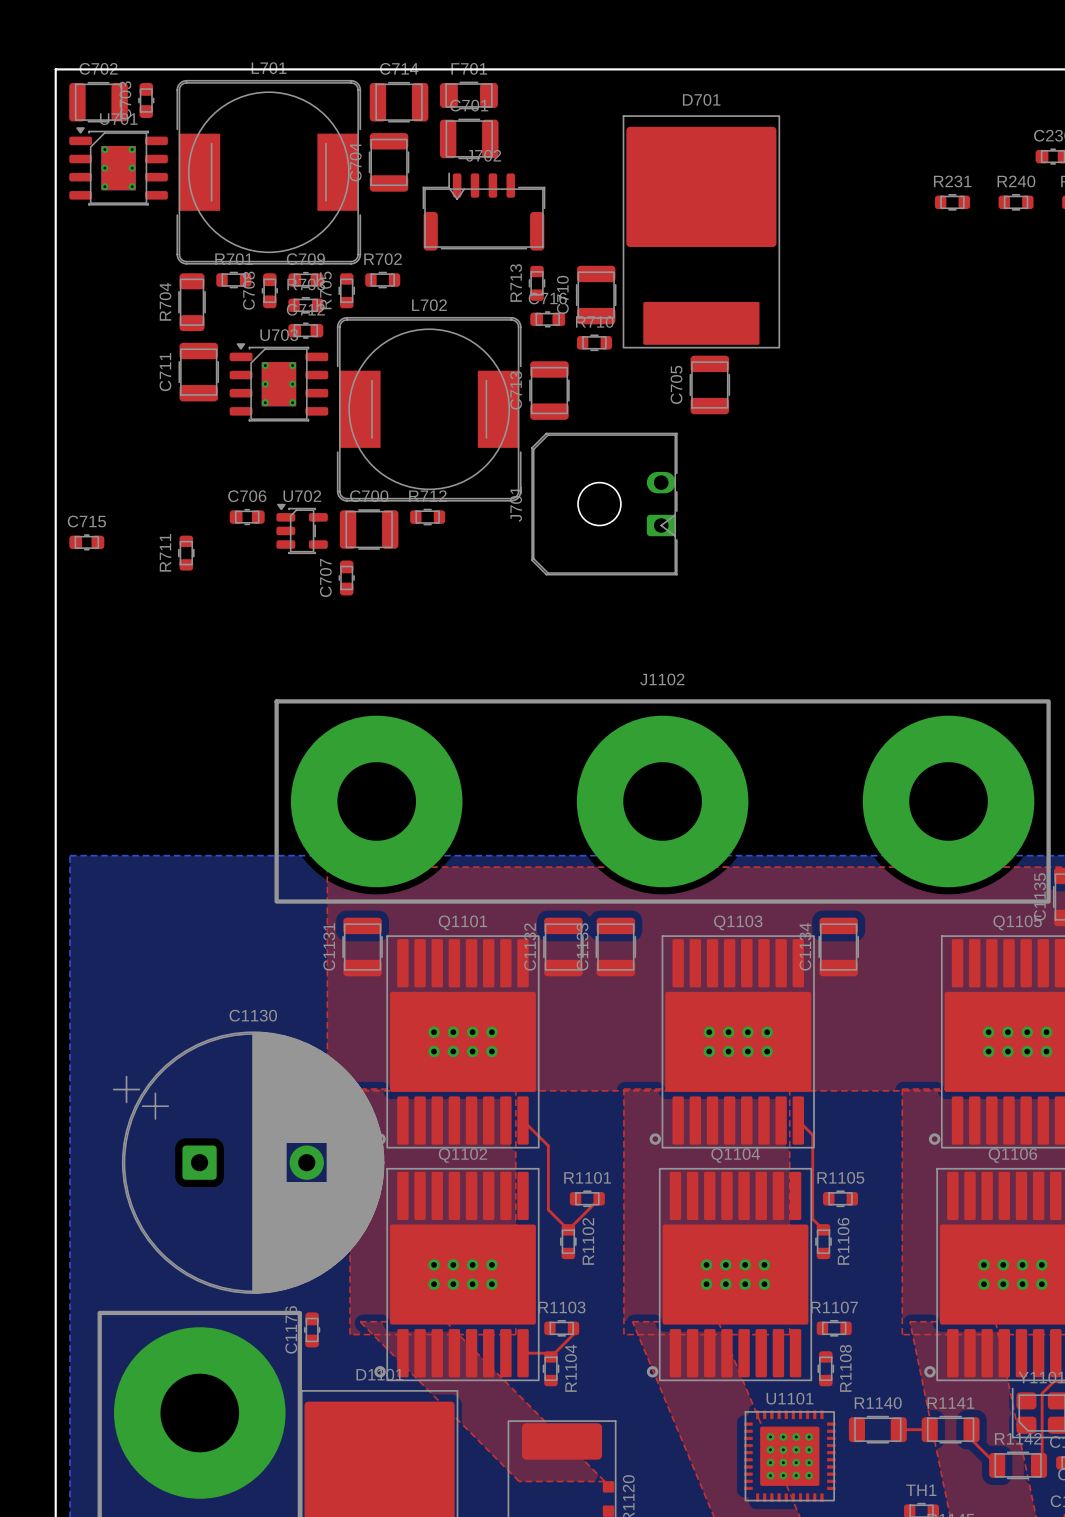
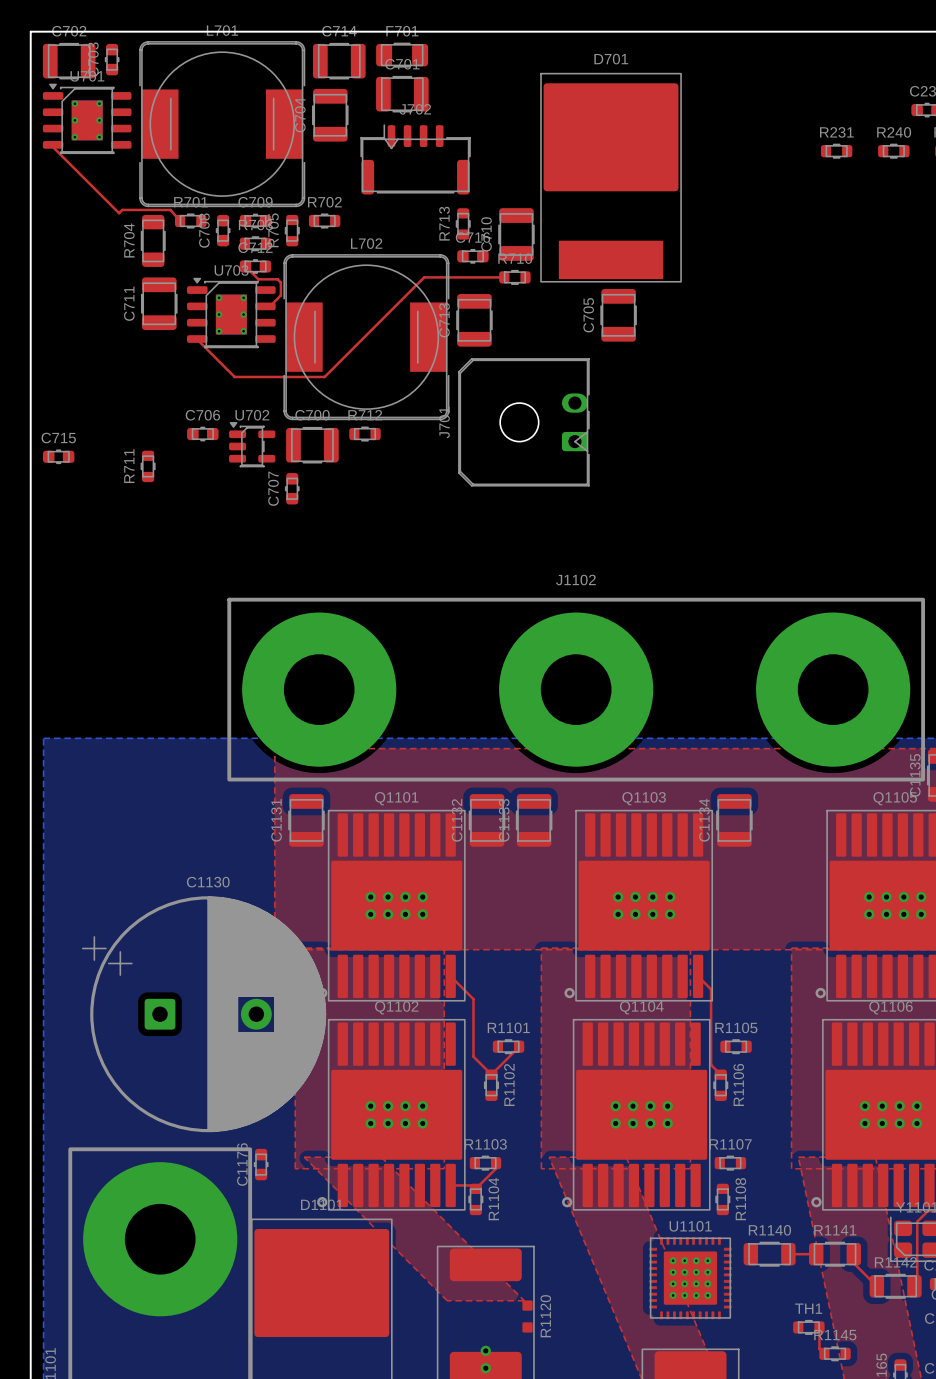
top track: none -> (53, 144) (51, 145) (119, 213) (122, 209) (170, 209) (180, 221)
top track: none -> (245, 266) (258, 279) (277, 279) (280, 282) (280, 295) (271, 305) (265, 306)
top track: none -> (504, 277) (424, 277) (324, 376) (234, 376) (197, 339)

